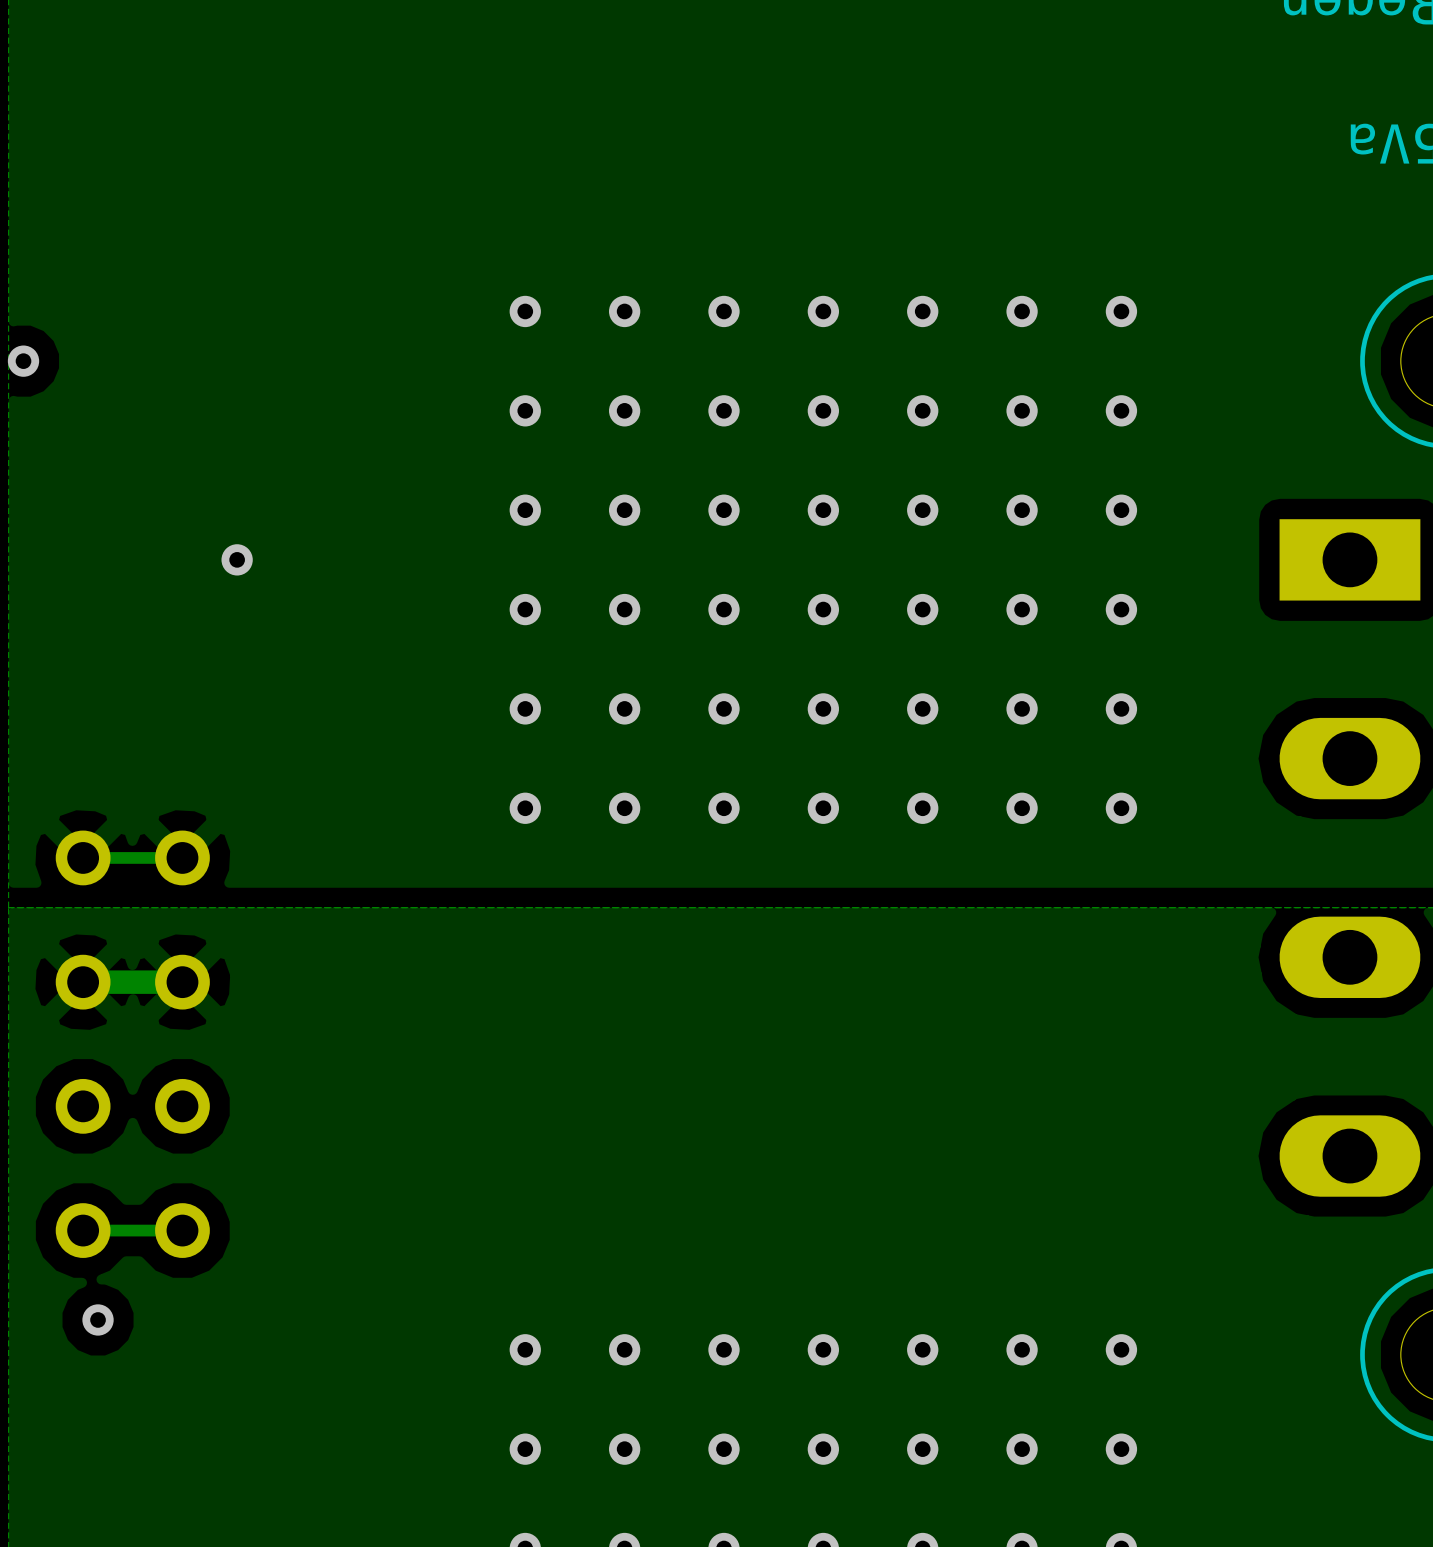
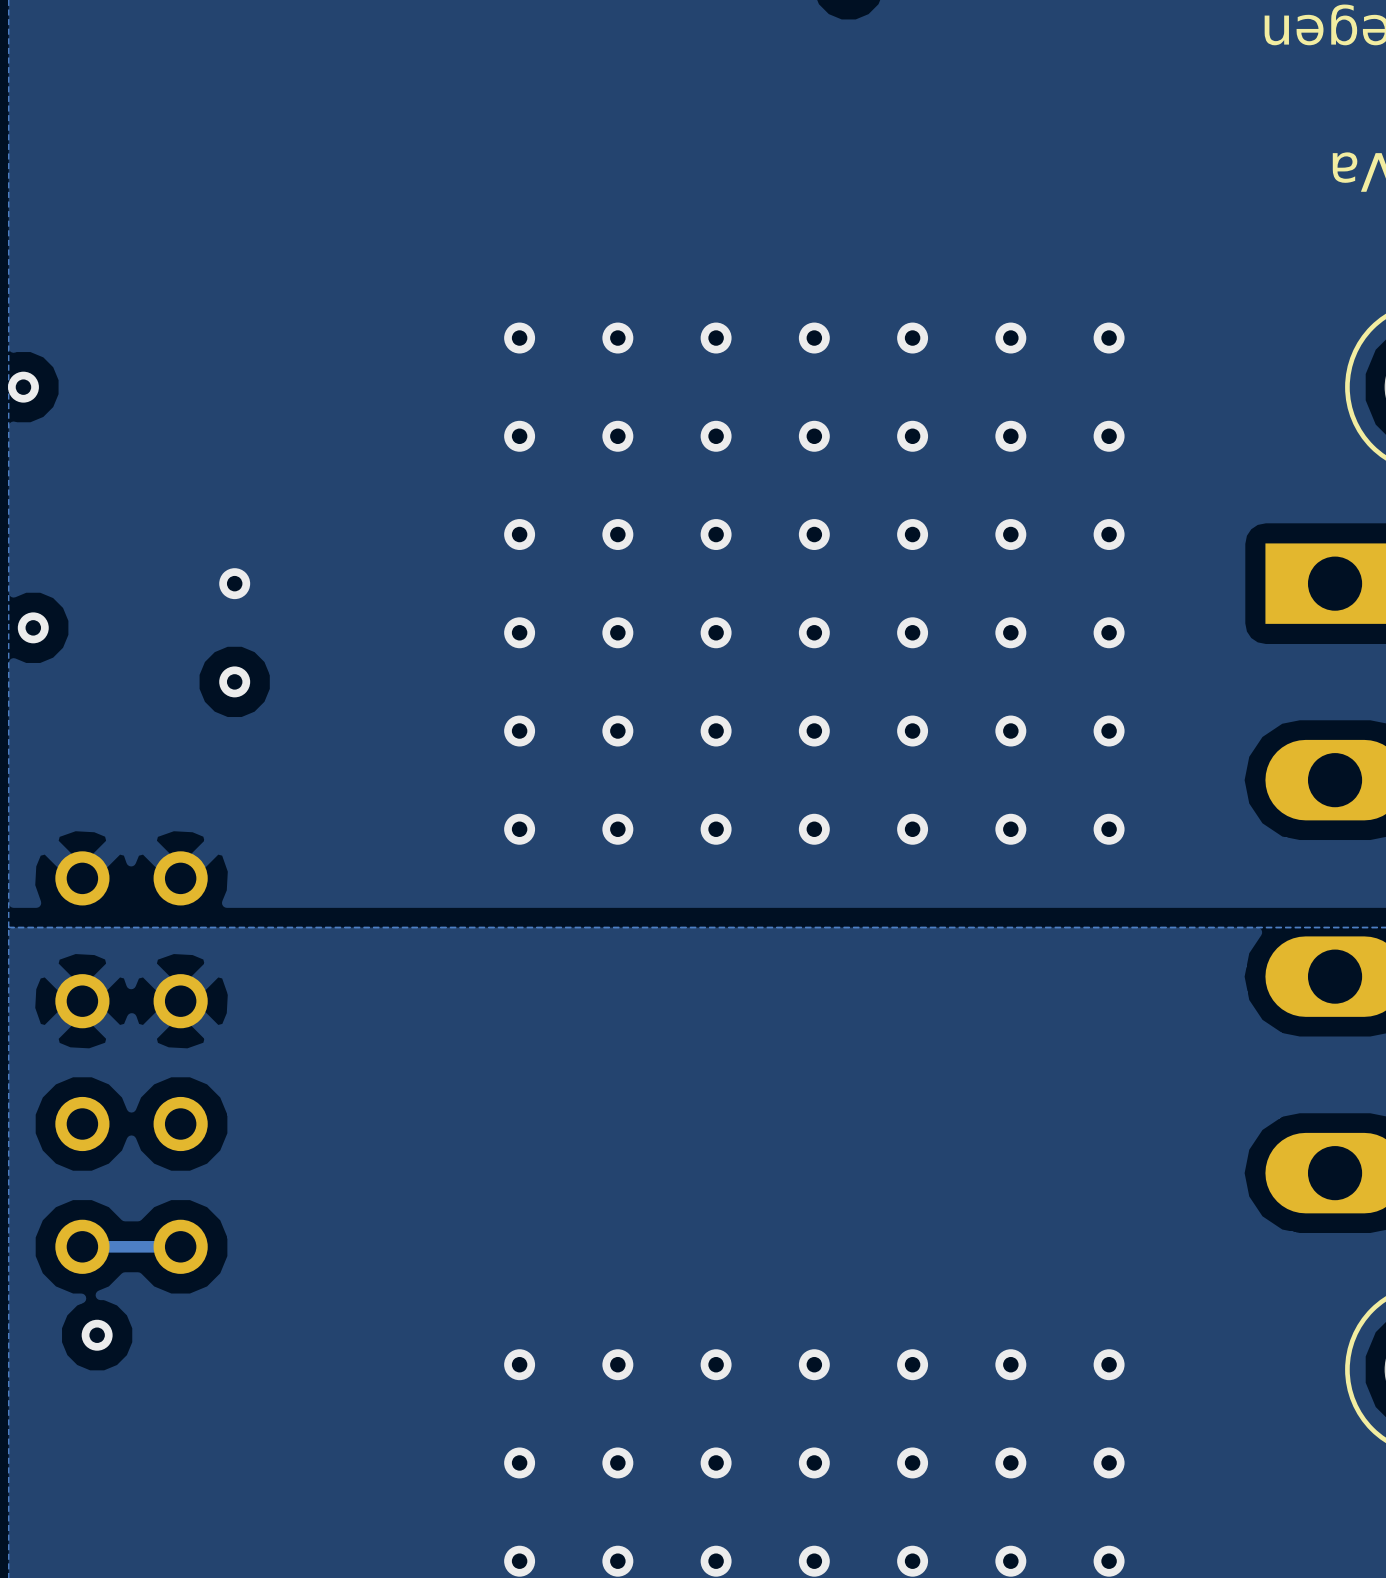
via: none -> (33, 627)
via: none -> (234, 681)
track: (182, 857) (83, 857) -> none
track: (182, 982) (83, 982) -> none

